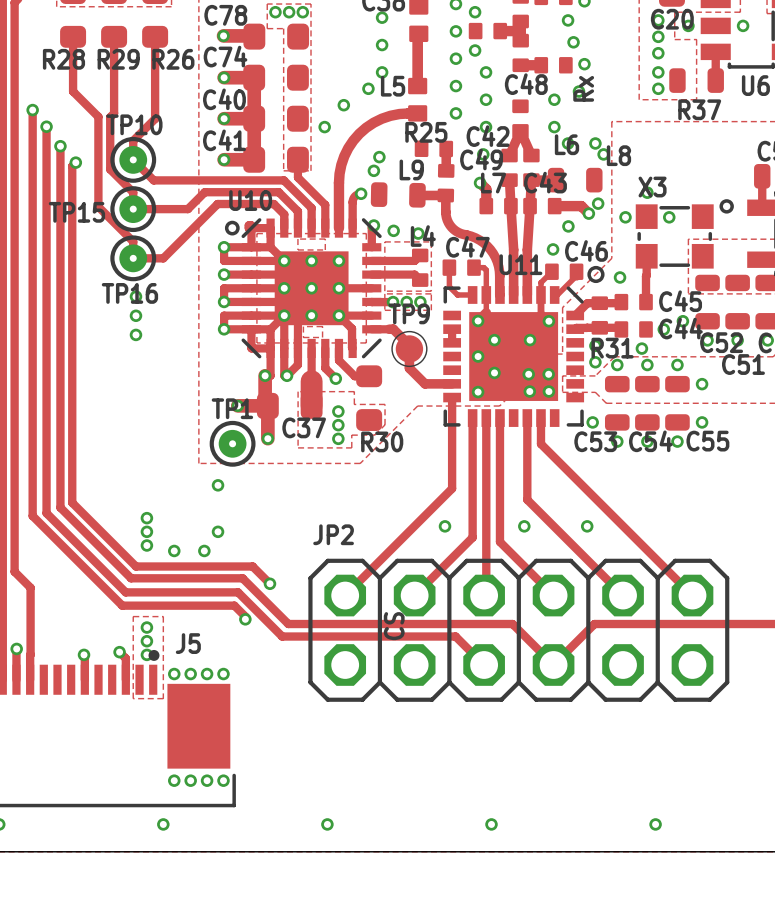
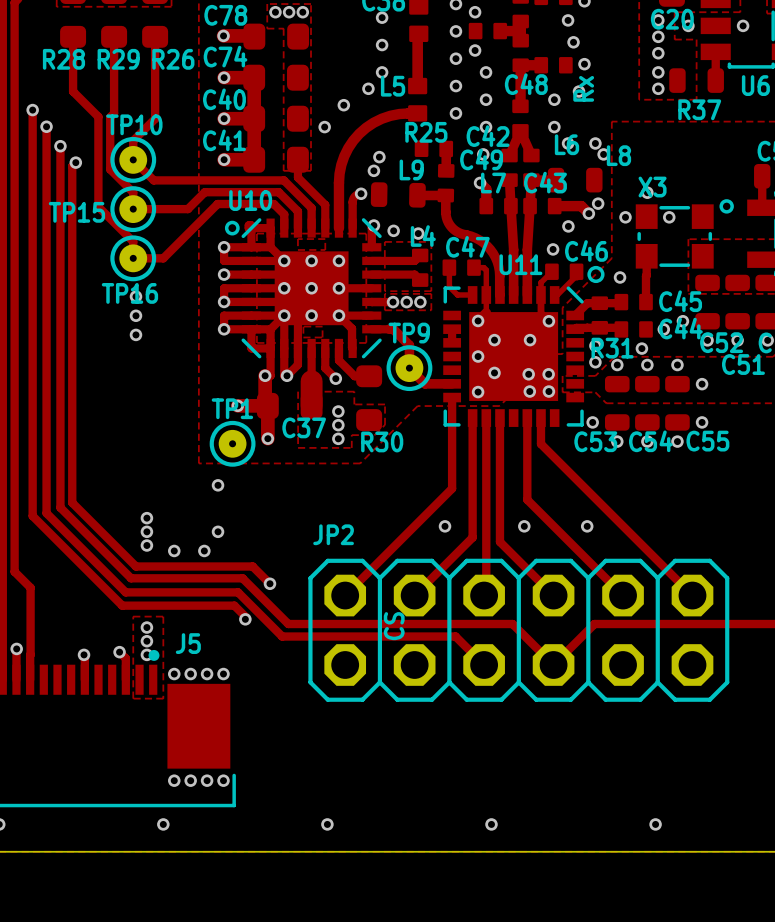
track: none -> (520, 65) (520, 106)
TP9 footprint: [391, 330, 428, 368] -> [386, 345, 433, 392]

